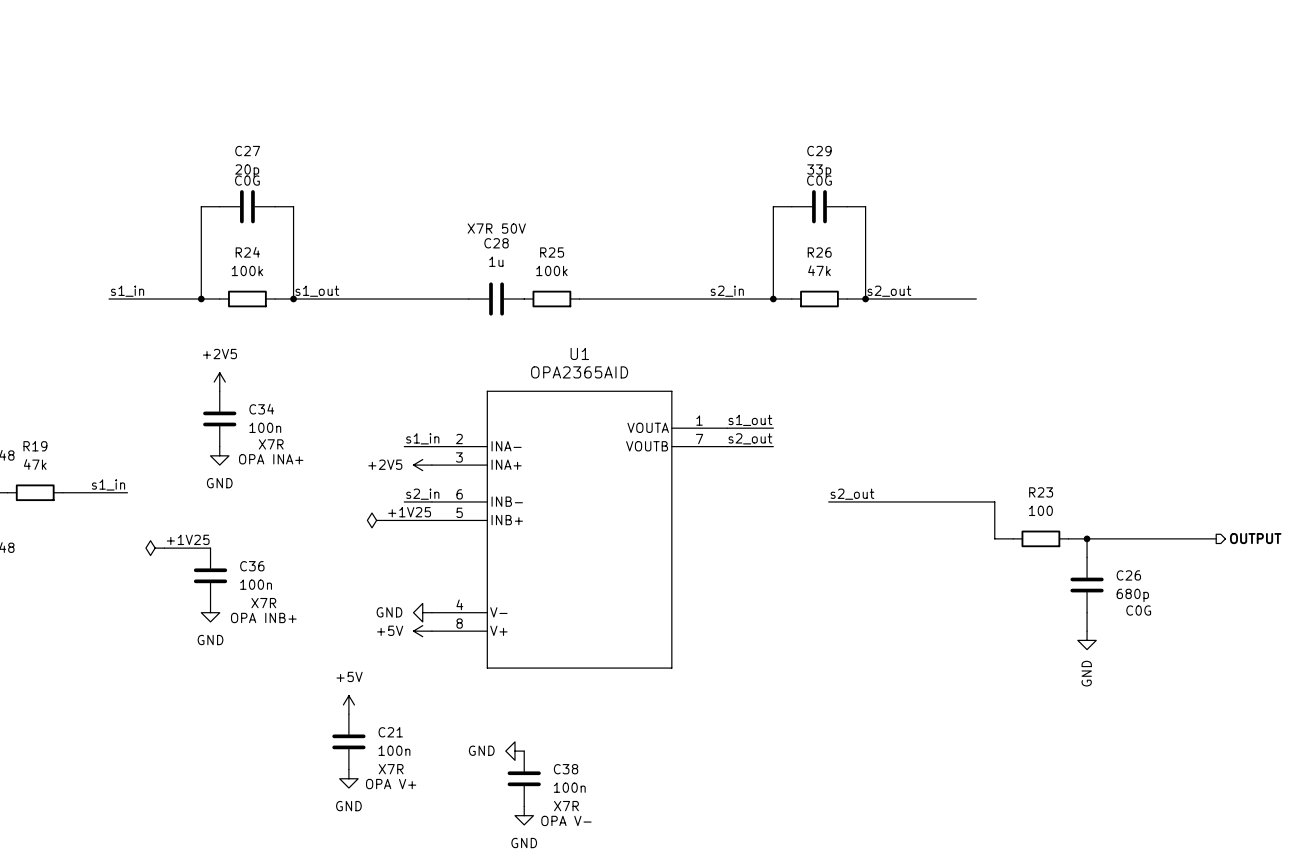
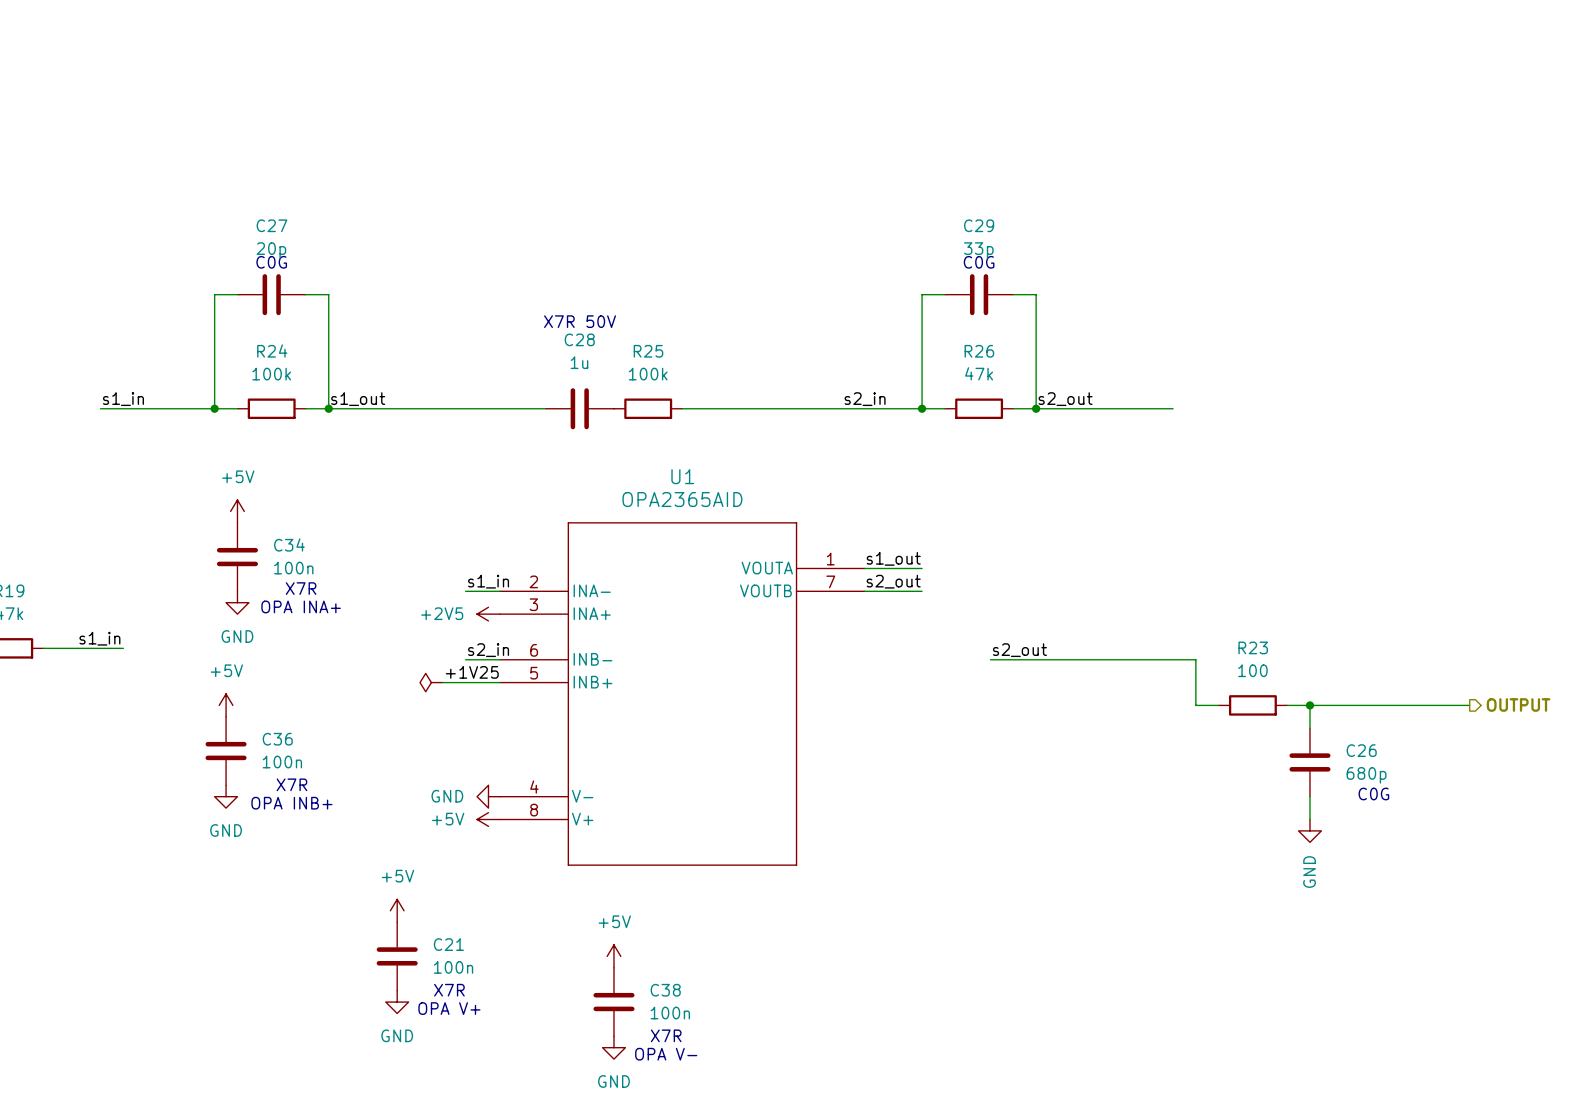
power symbol: +2V5 (219, 382) -> +5V (237, 511)
power symbol: none -> +5V (226, 705)
label: +1V25 (188, 539) -> none
power symbol: (155, 548) -> none
wire: (164, 548) (210, 548) -> none
power symbol: none -> +5V (613, 956)
power symbol: GND (514, 751) -> none

